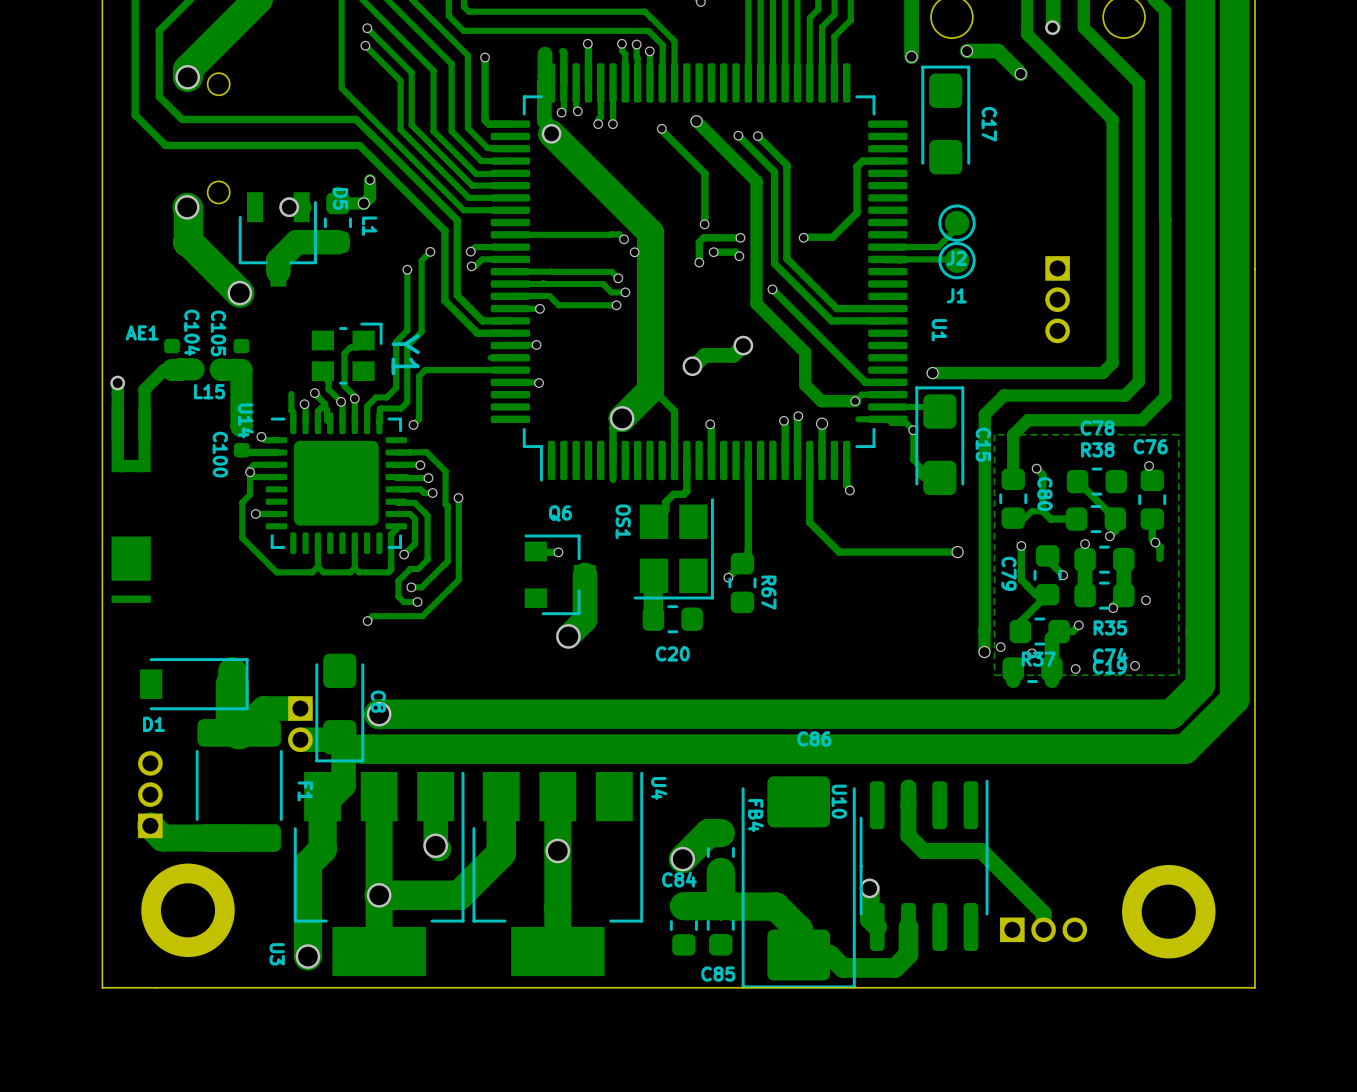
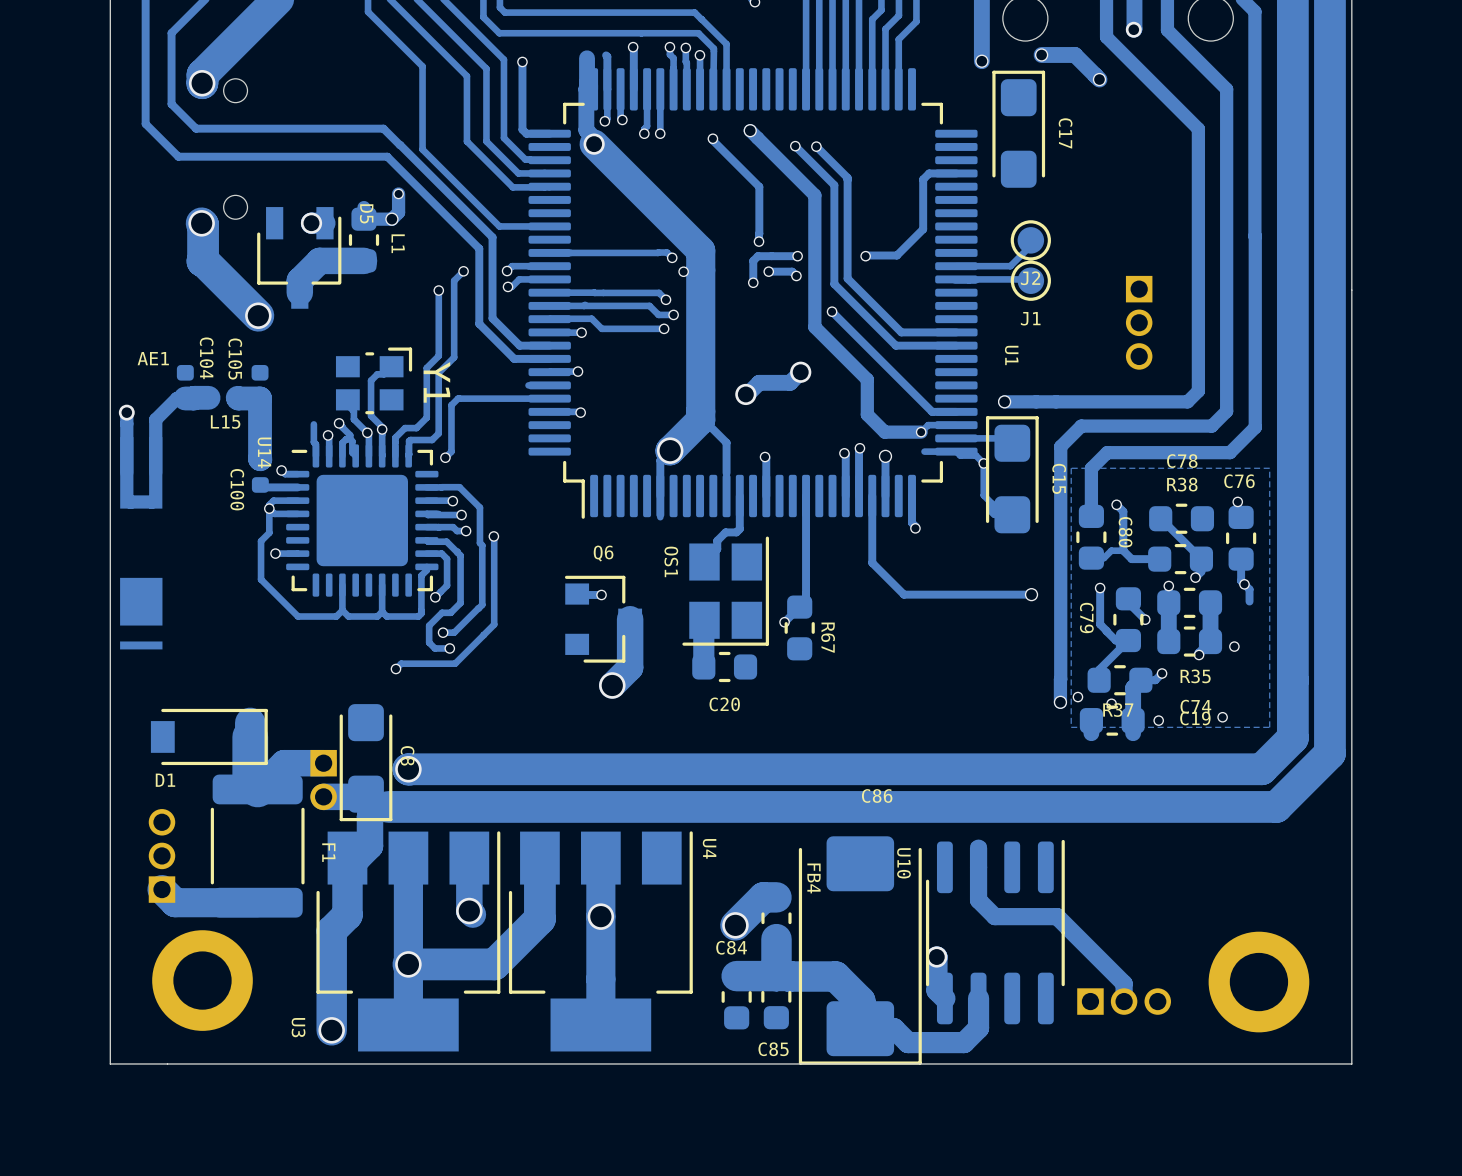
track: (341, 11) (341, 88) (392, 138) -> (368, 11) (422, 66) (422, 149)
track: (367, 28) (411, 72) (411, 125) (472, 185) (510, 185) -> none
via: (367, 28) -> none
track: (365, 45) (400, 80) (400, 129) (468, 197) (510, 197) -> none
via: (365, 45) -> none

